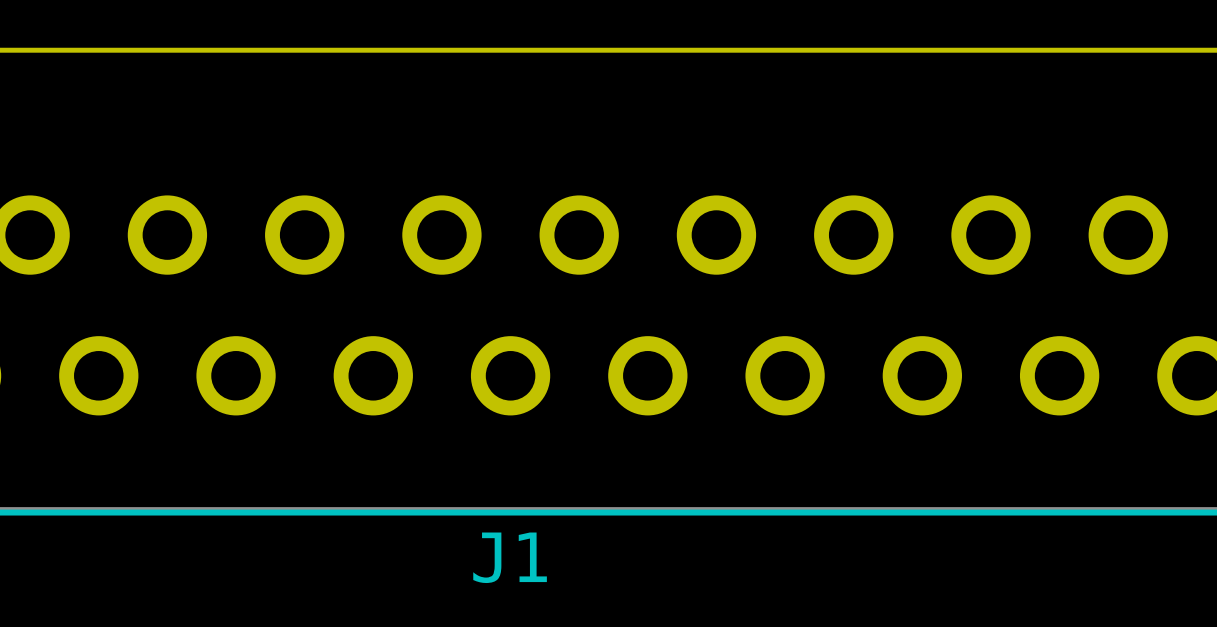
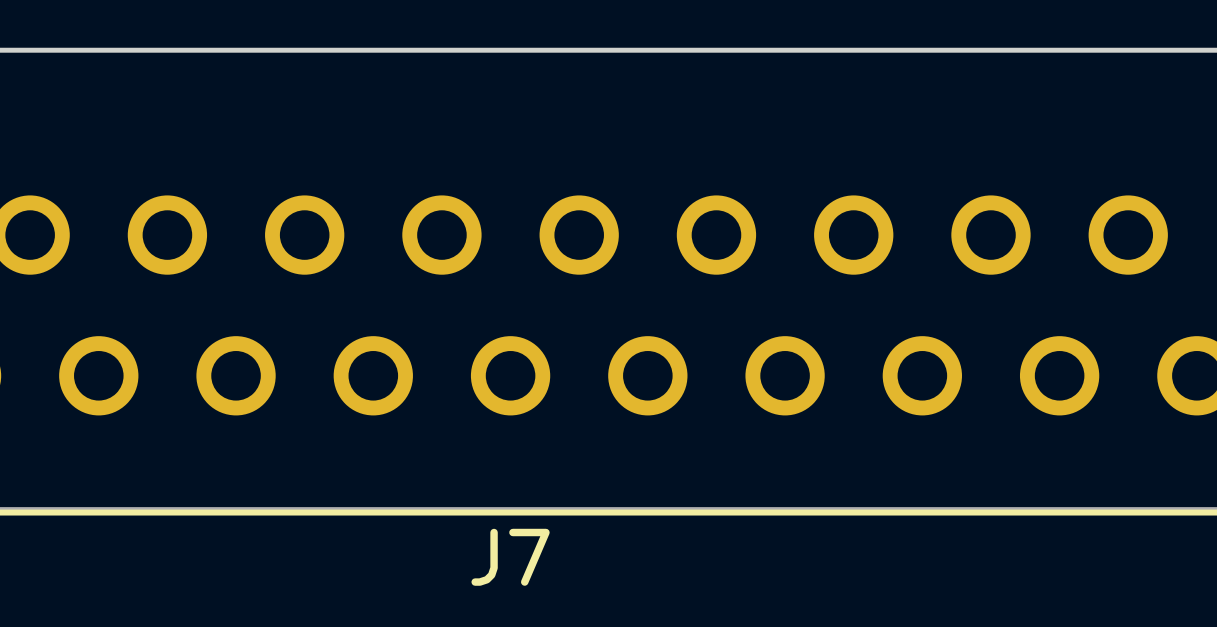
J1 name: J1 (510, 557) -> J7 (510, 557)

